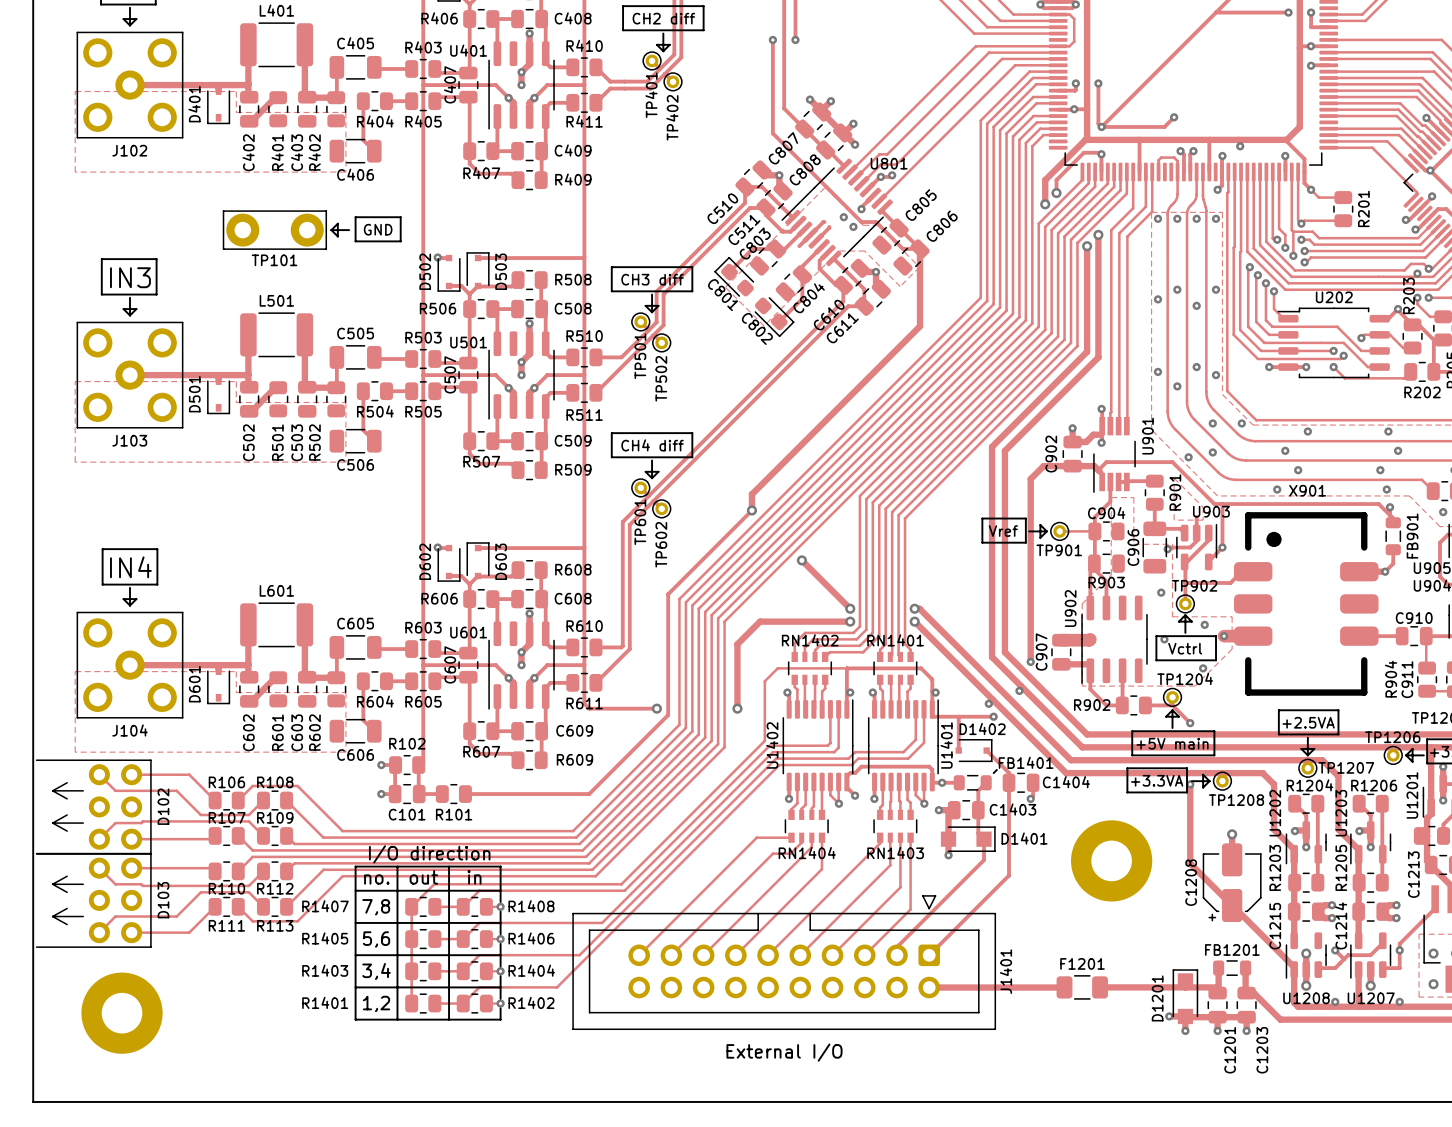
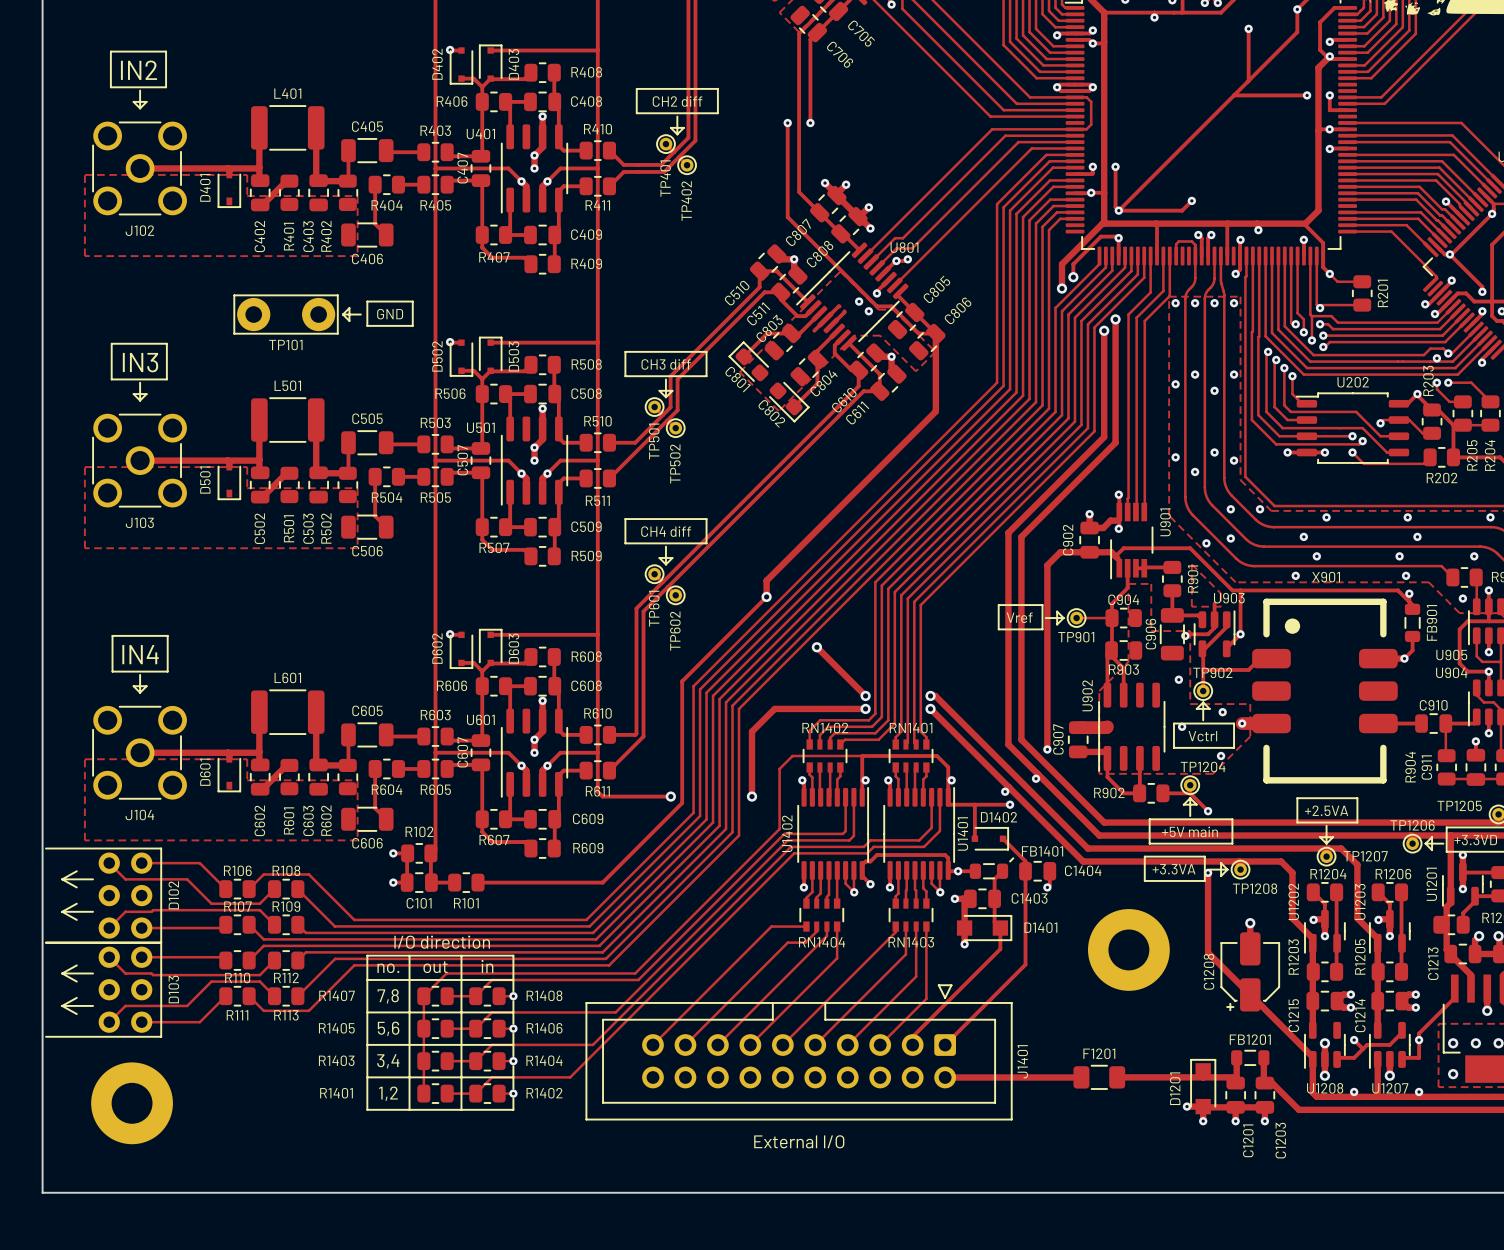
J102 footprint: [76, 31, 184, 139] -> [92, 121, 187, 216]
J103 footprint: [76, 321, 184, 429] -> [92, 413, 187, 508]
J104 footprint: [76, 611, 184, 719] -> [92, 705, 187, 800]

